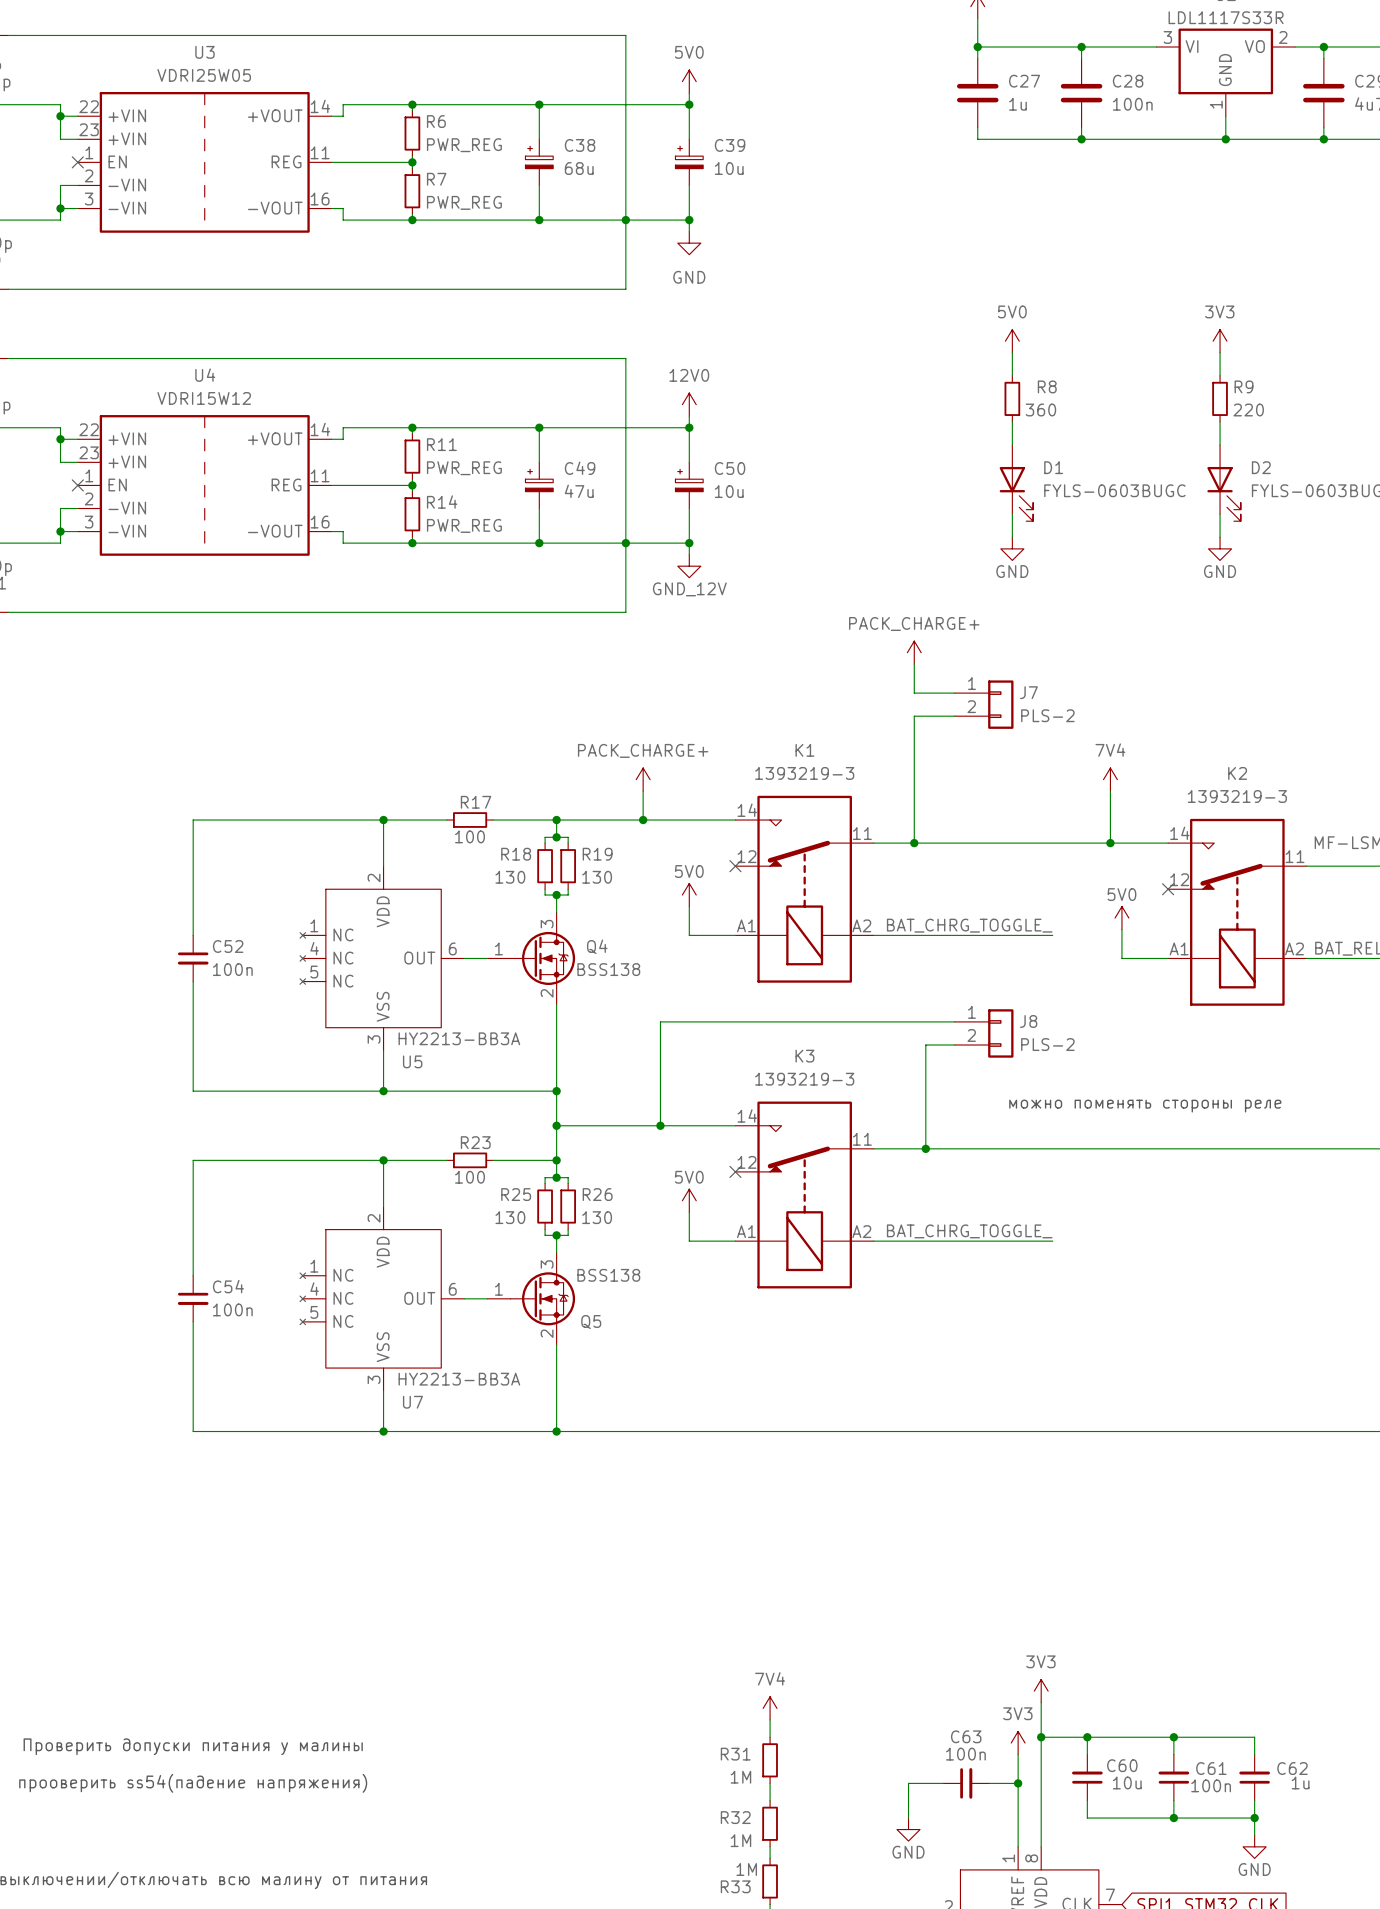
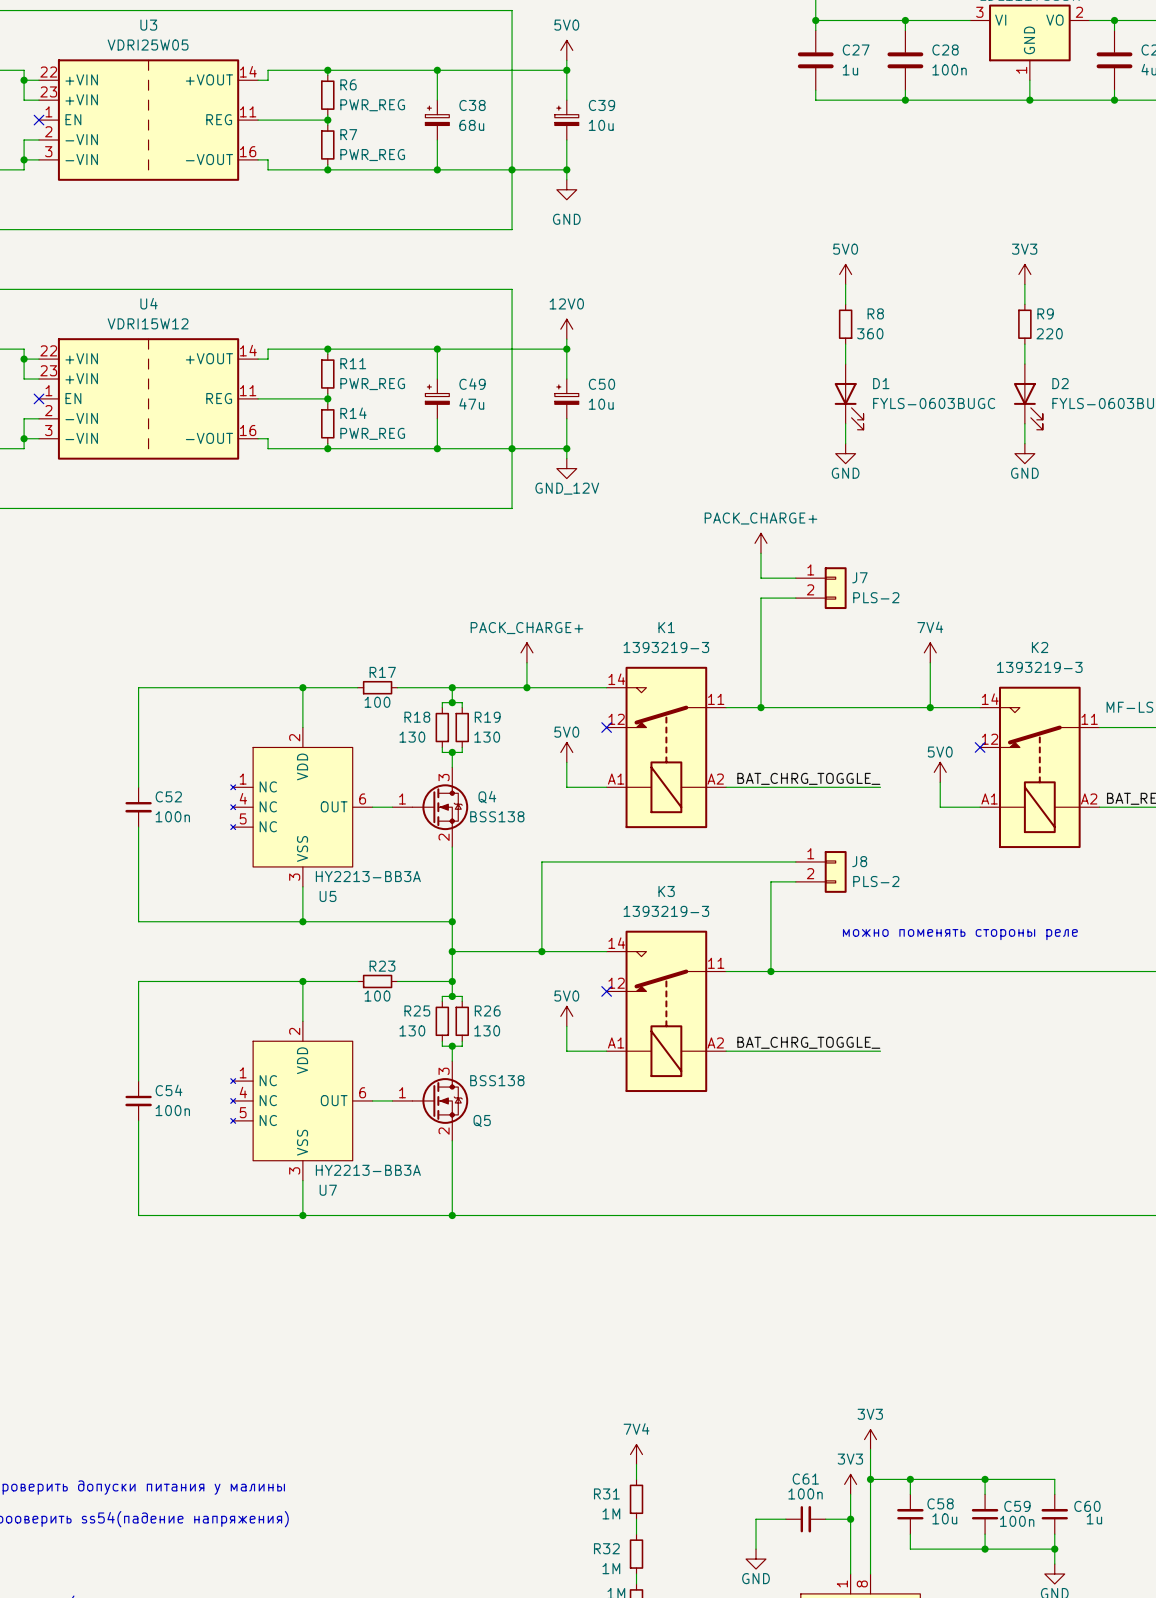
C63 name: C63 (966, 1736) -> C61 (805, 1479)
C60 name: C60 (1122, 1765) -> C58 (940, 1503)
C61 name: C61 (1211, 1768) -> C59 (1017, 1506)
C62 name: C62 (1292, 1768) -> C60 (1087, 1506)

